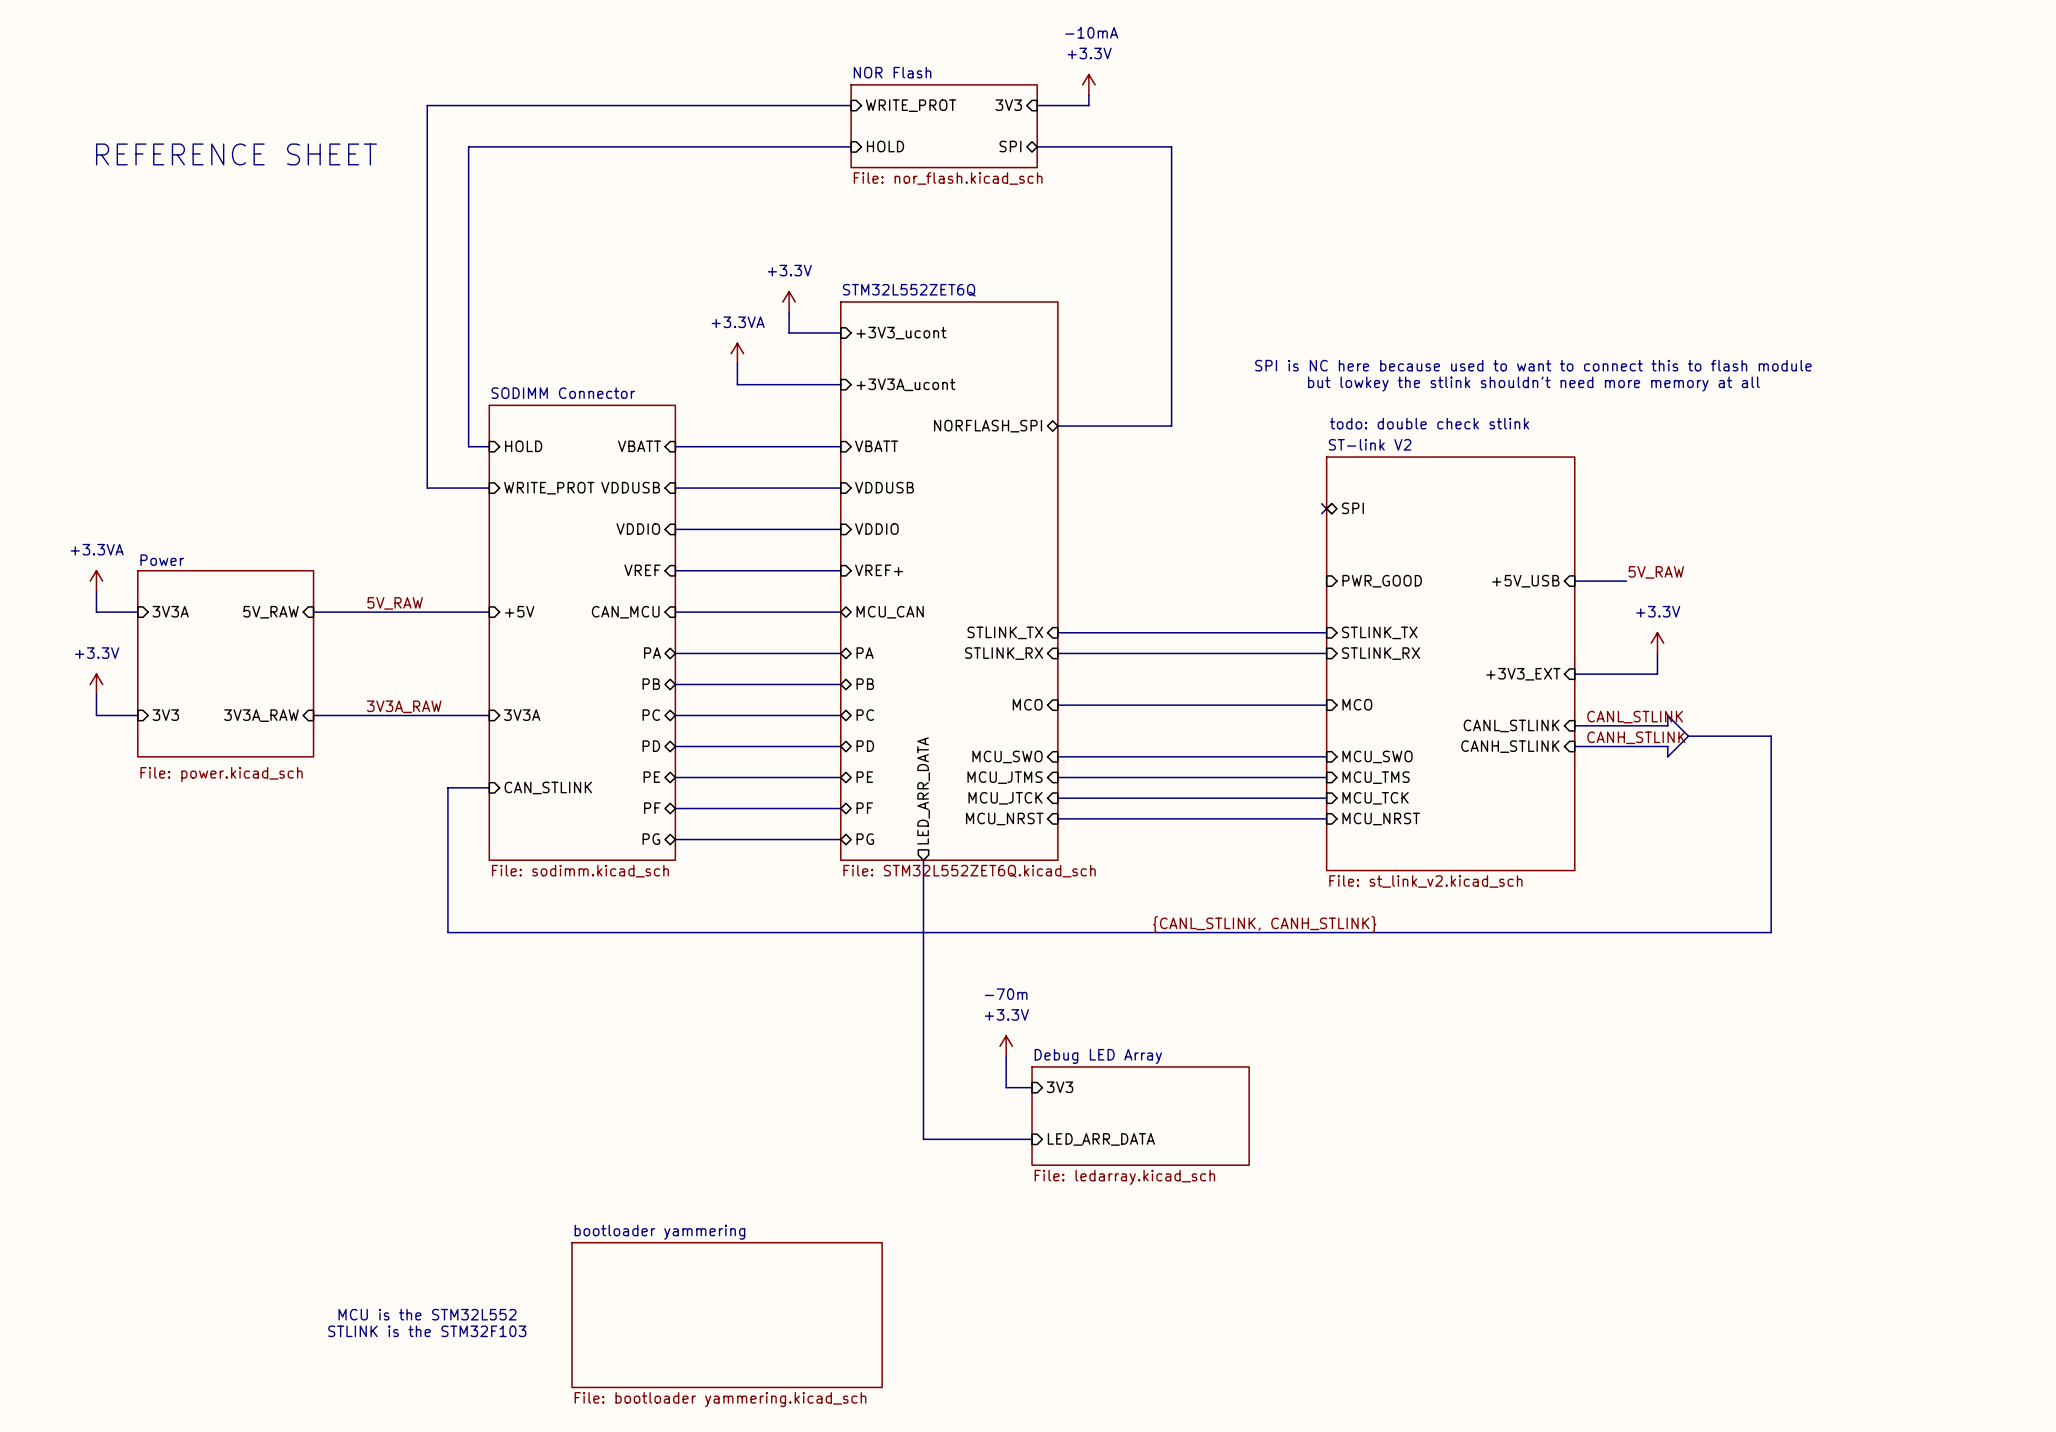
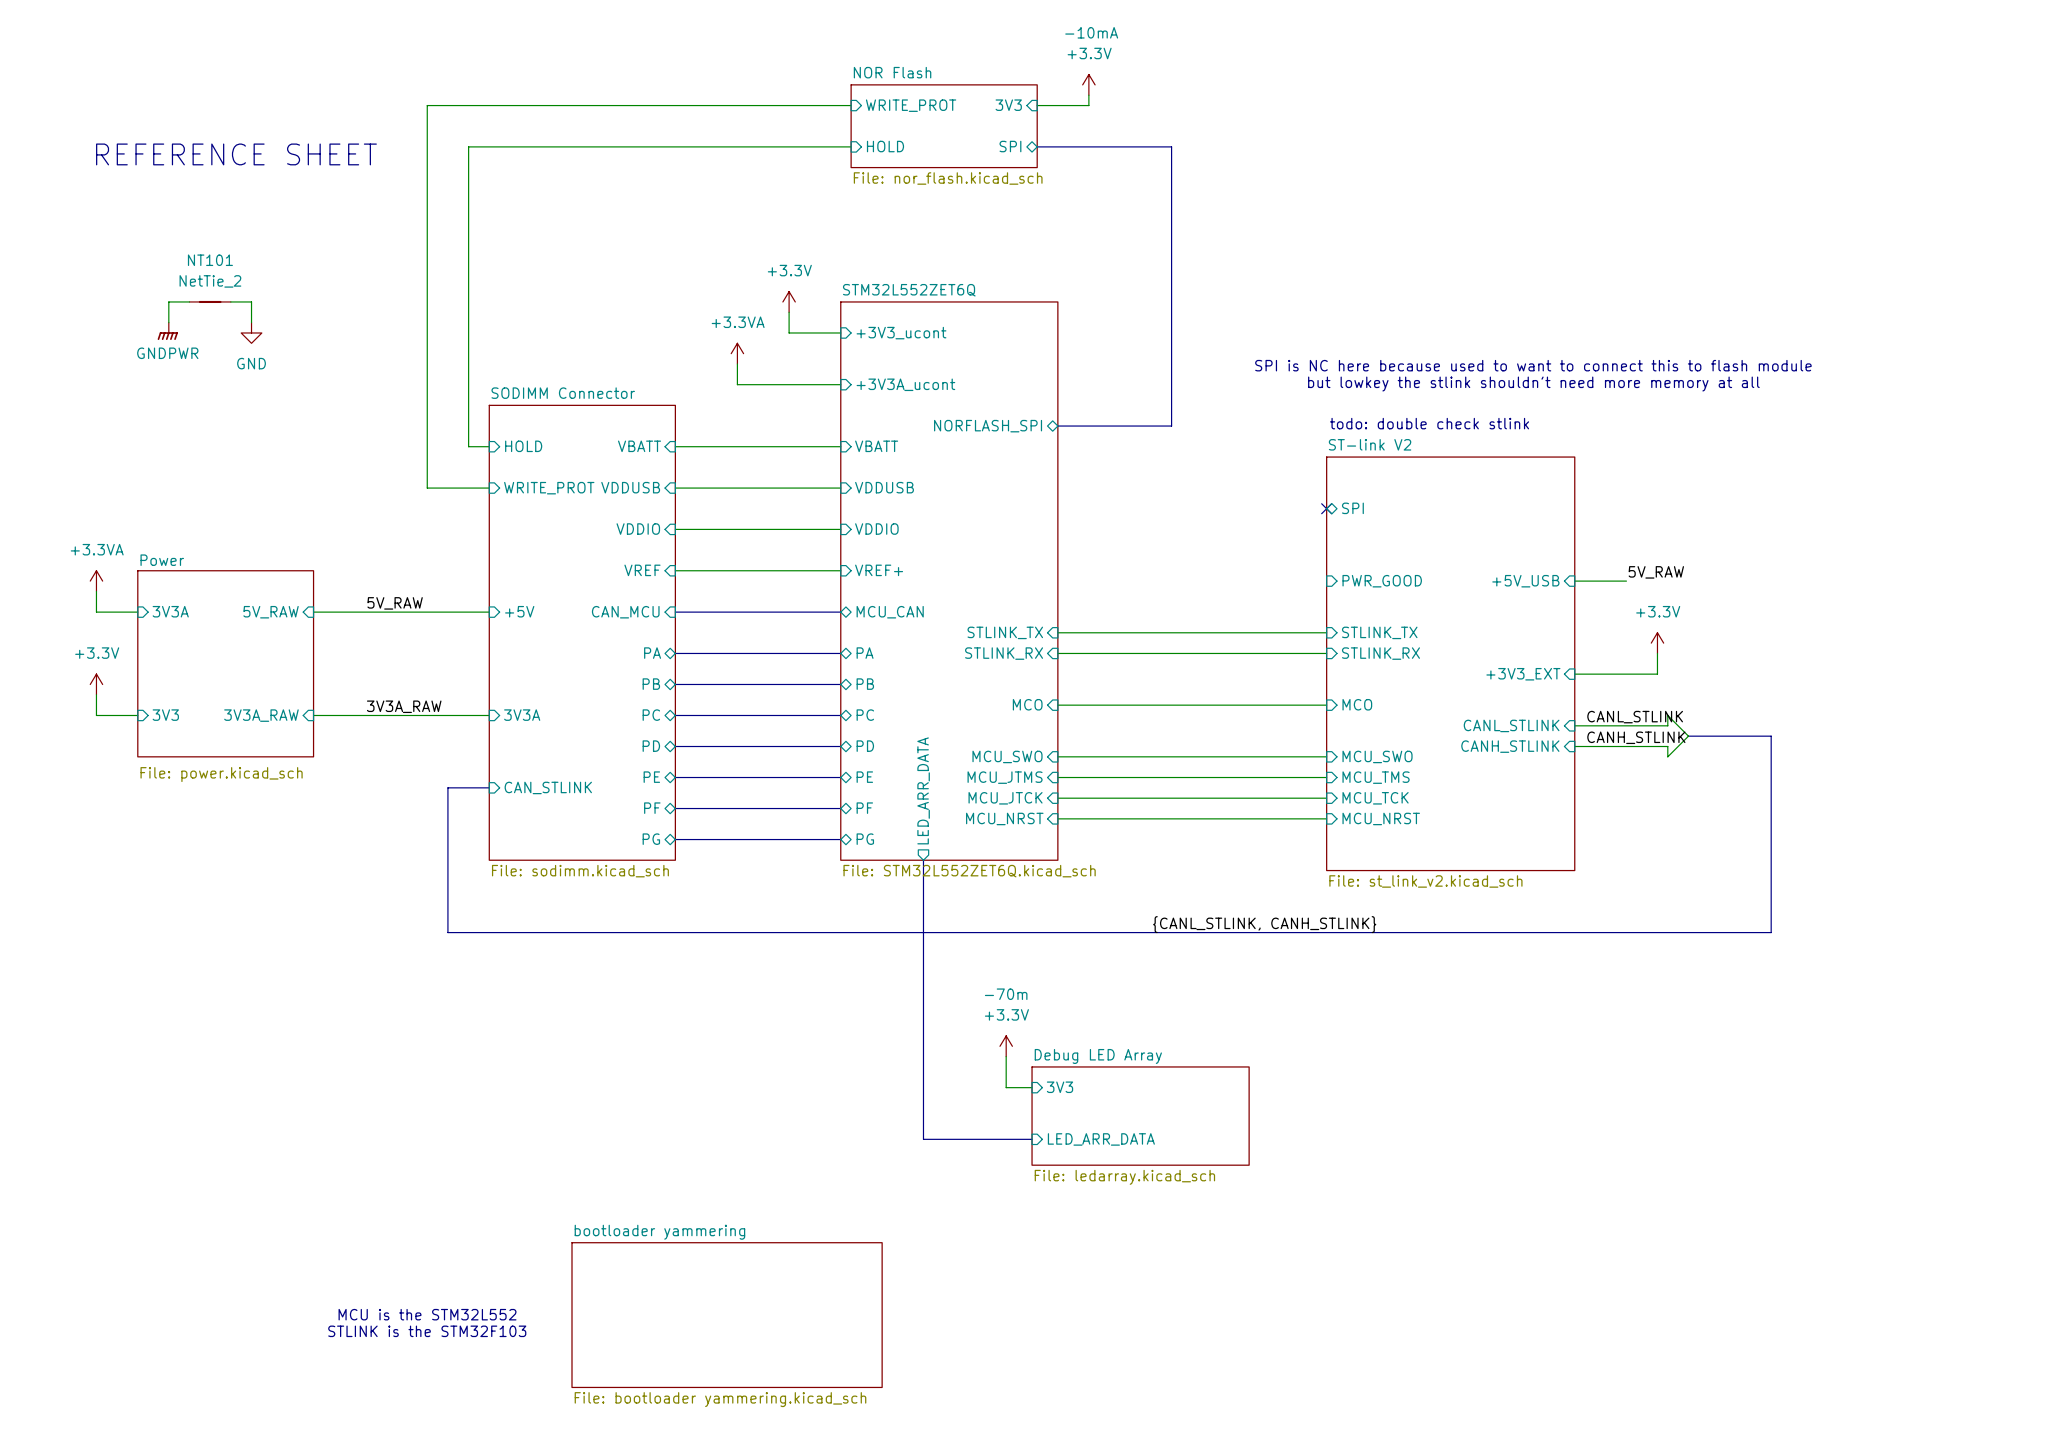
wire: none -> (189, 301) (168, 301) (168, 322)
NT101: none -> NetTie_2 (210, 301)
wire: none -> (230, 301) (251, 301) (251, 322)
power symbol: none -> GNDPWR (167, 331)
power symbol: none -> GND (251, 332)

